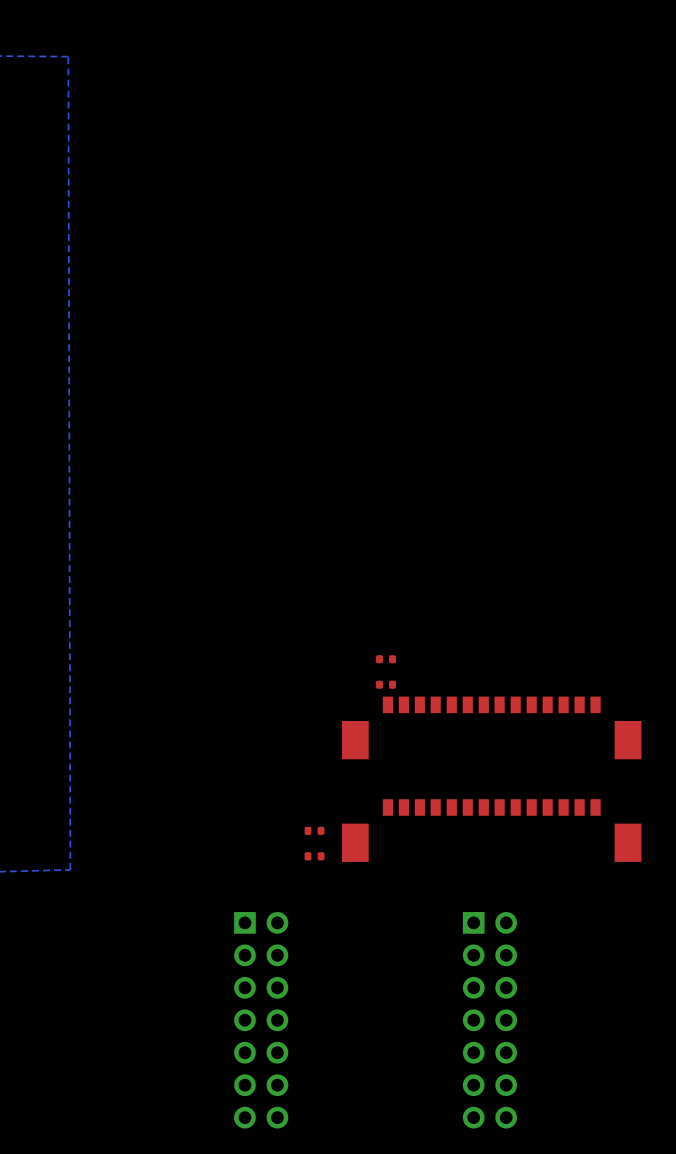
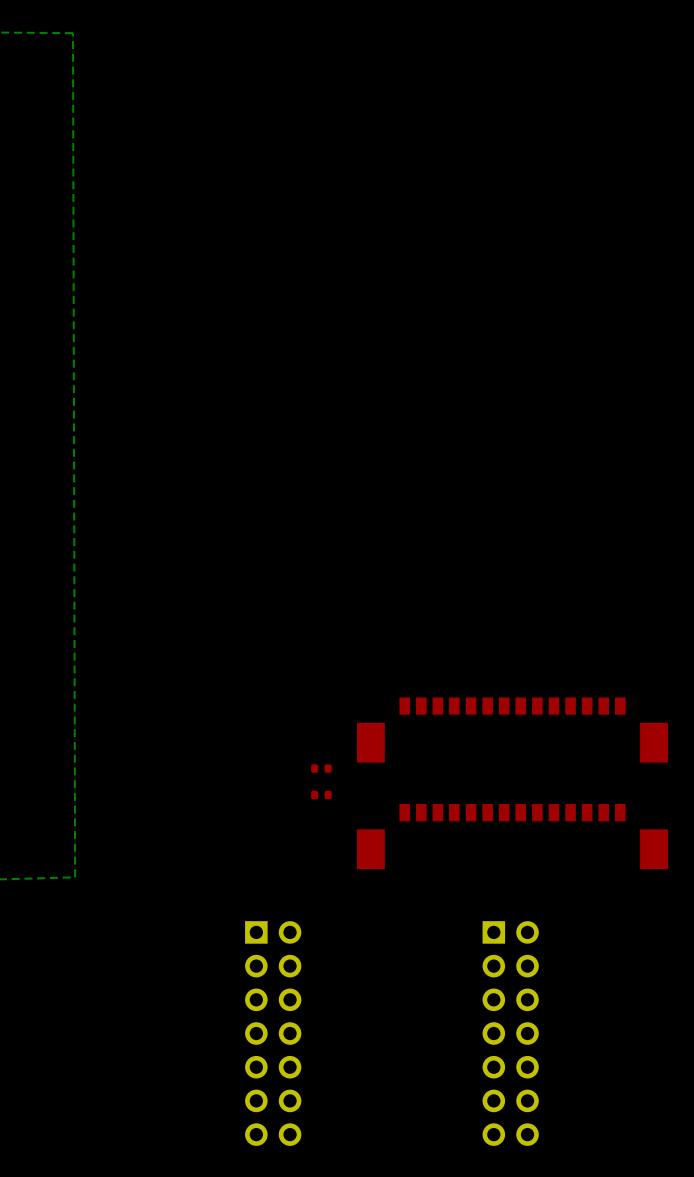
part: (385, 659) -> none
part: (385, 684) -> none
part: none -> (321, 768)
part: none -> (321, 794)
part: (314, 830) -> none
part: (314, 856) -> none

